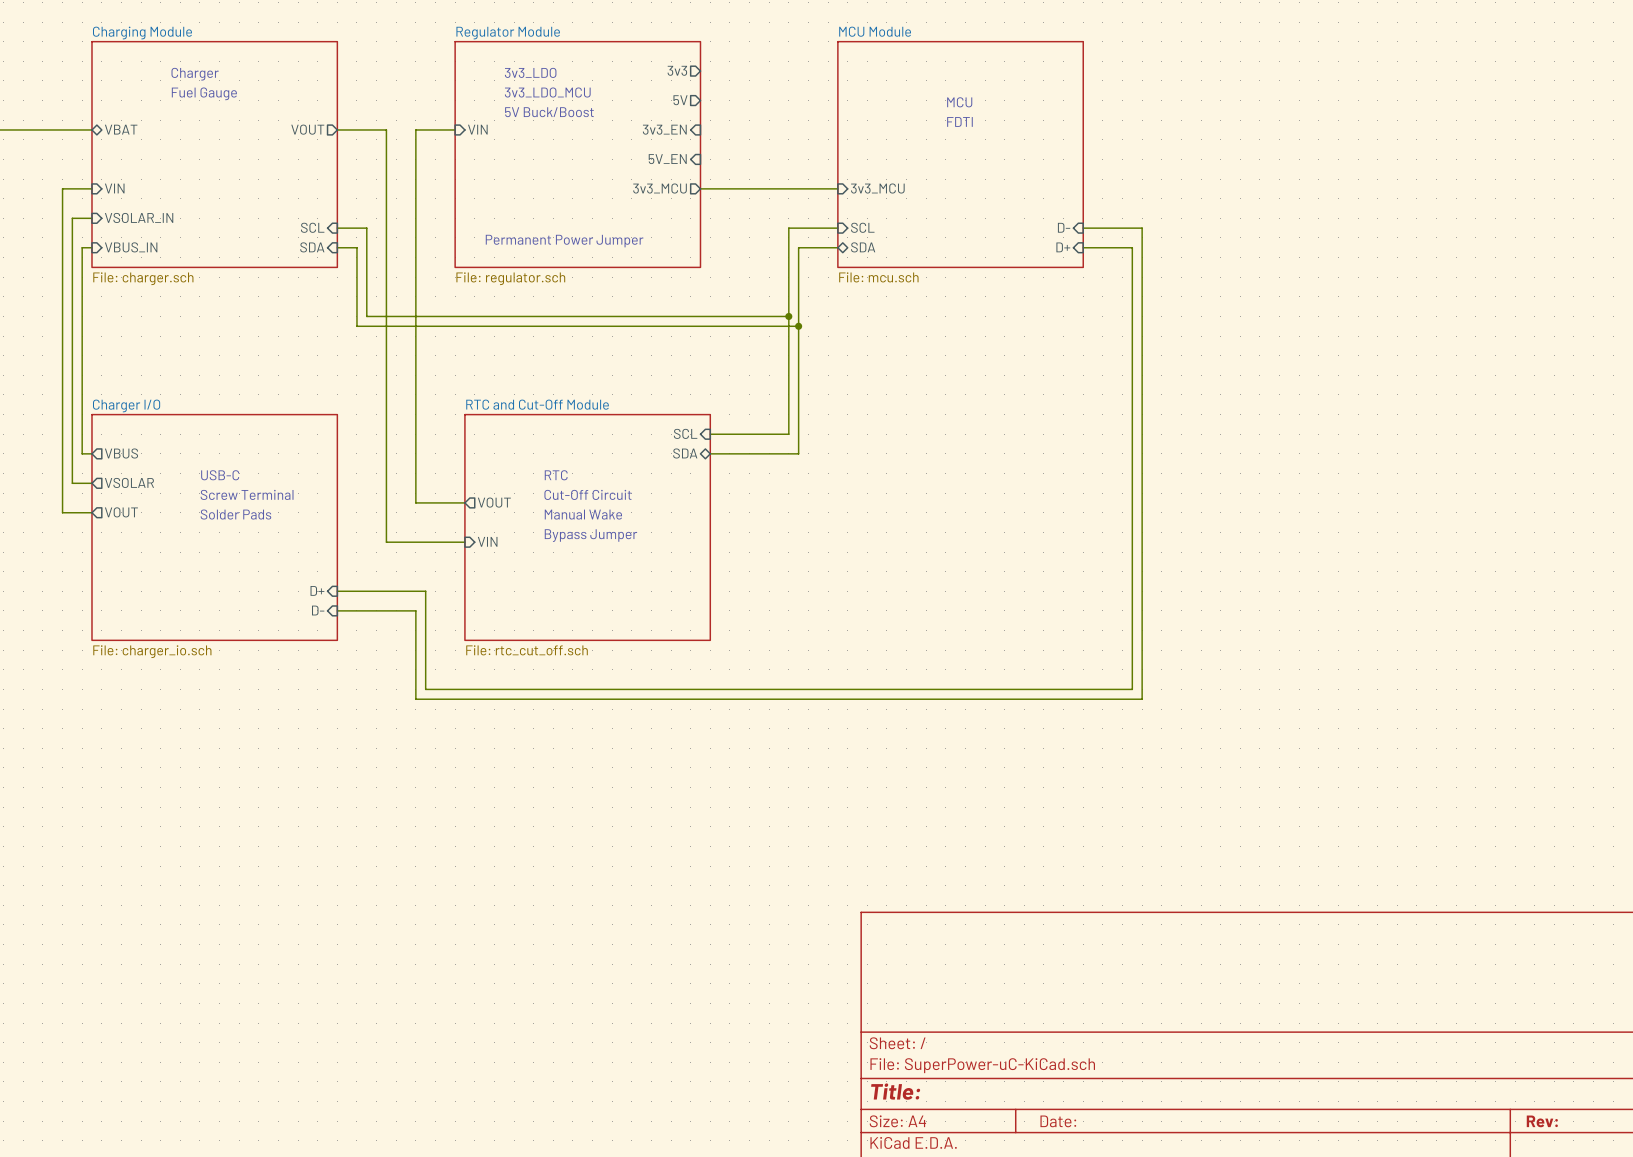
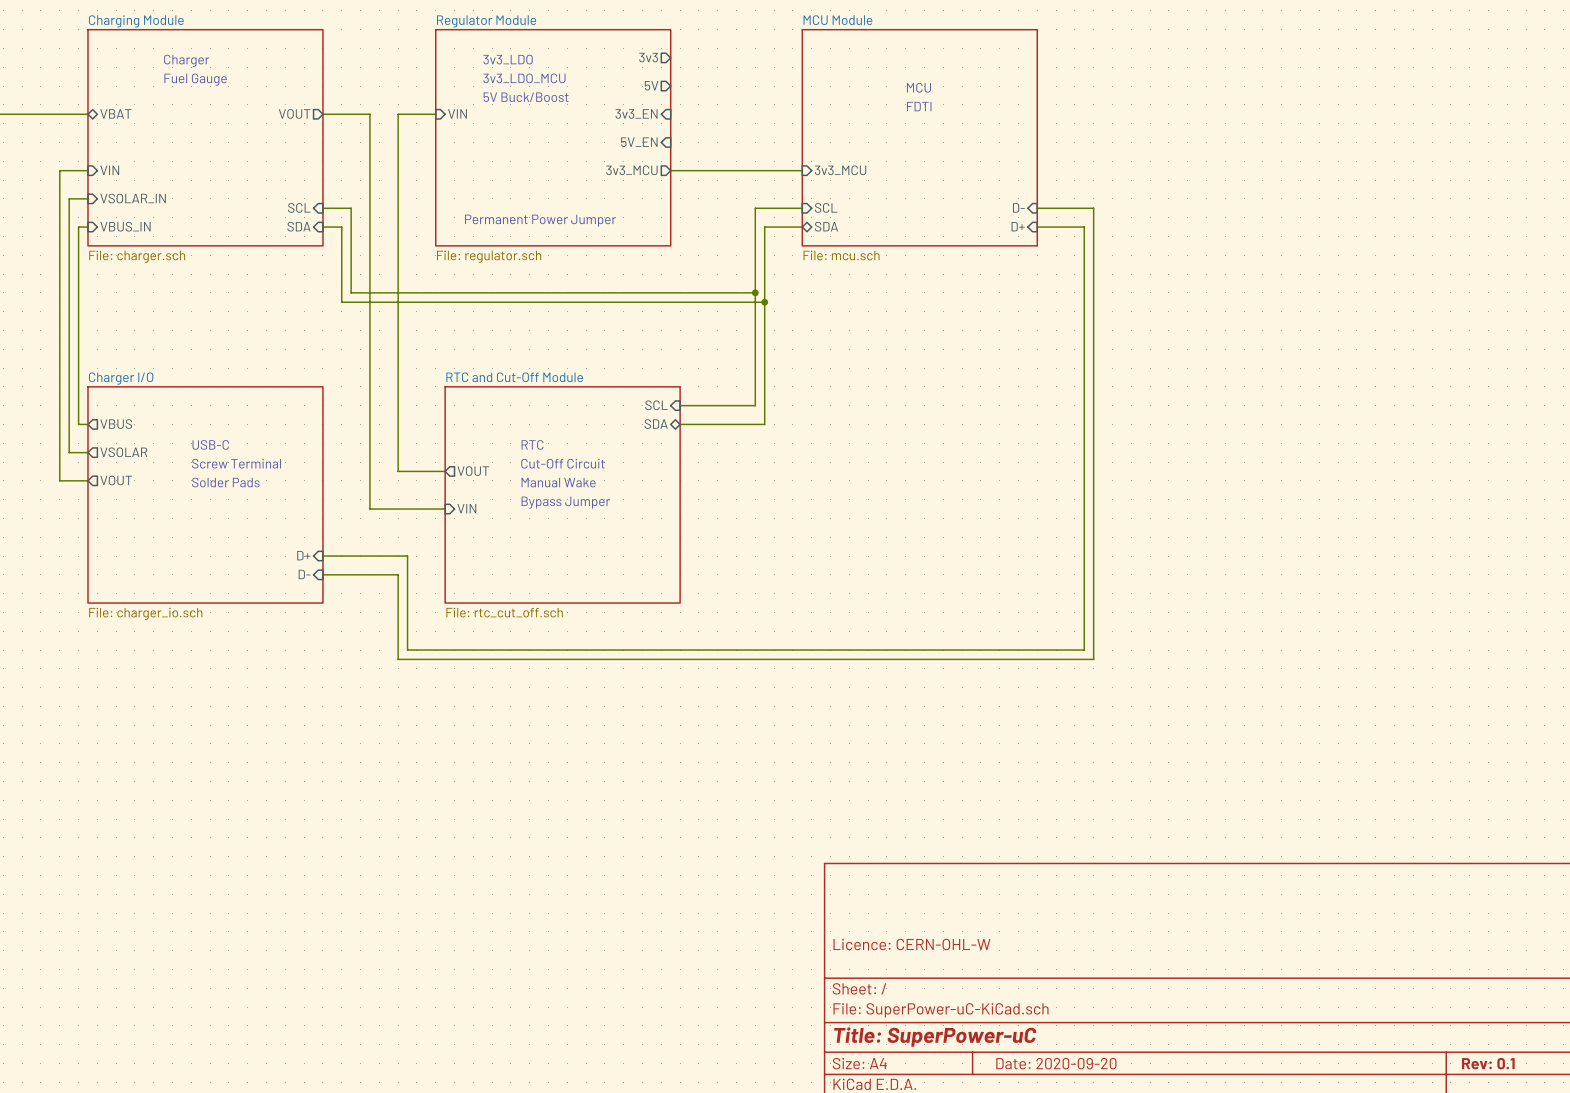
title block: none -> Licence: CERN-OHL-W (911, 944)
title block: Title: (895, 1091) -> Title: SuperPower-uC (935, 1037)
title block: Date: (1058, 1121) -> Date: 2020-09-20 (1056, 1063)
title block: Rev: (1542, 1121) -> Rev: 0.1 (1488, 1063)

